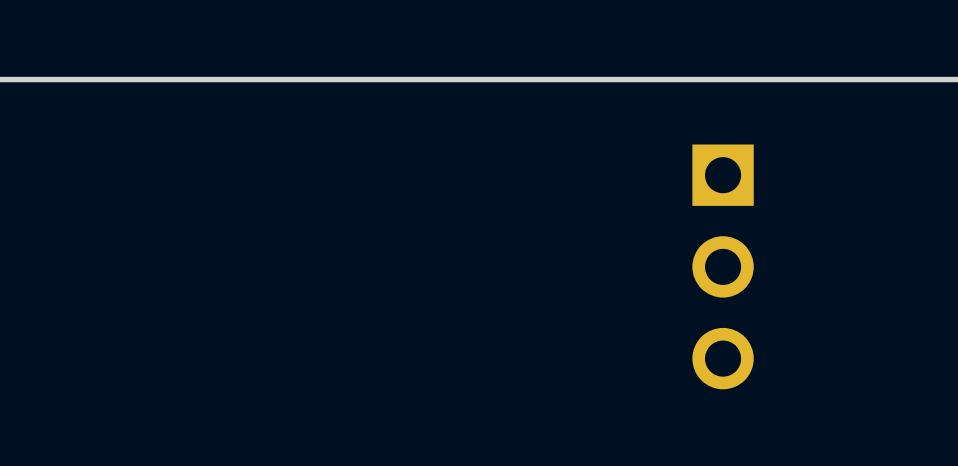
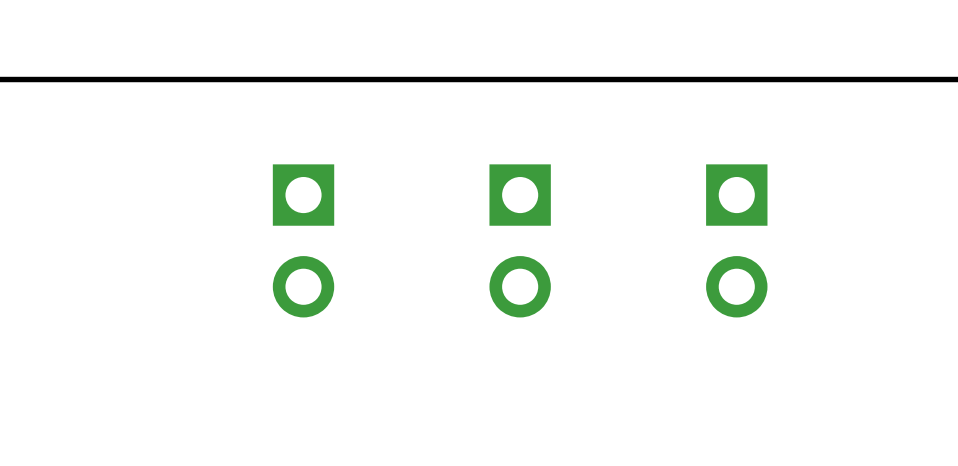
part footprint: [692, 144, 754, 390] -> [706, 164, 768, 318]
part: none -> (303, 240)
part: none -> (520, 240)

